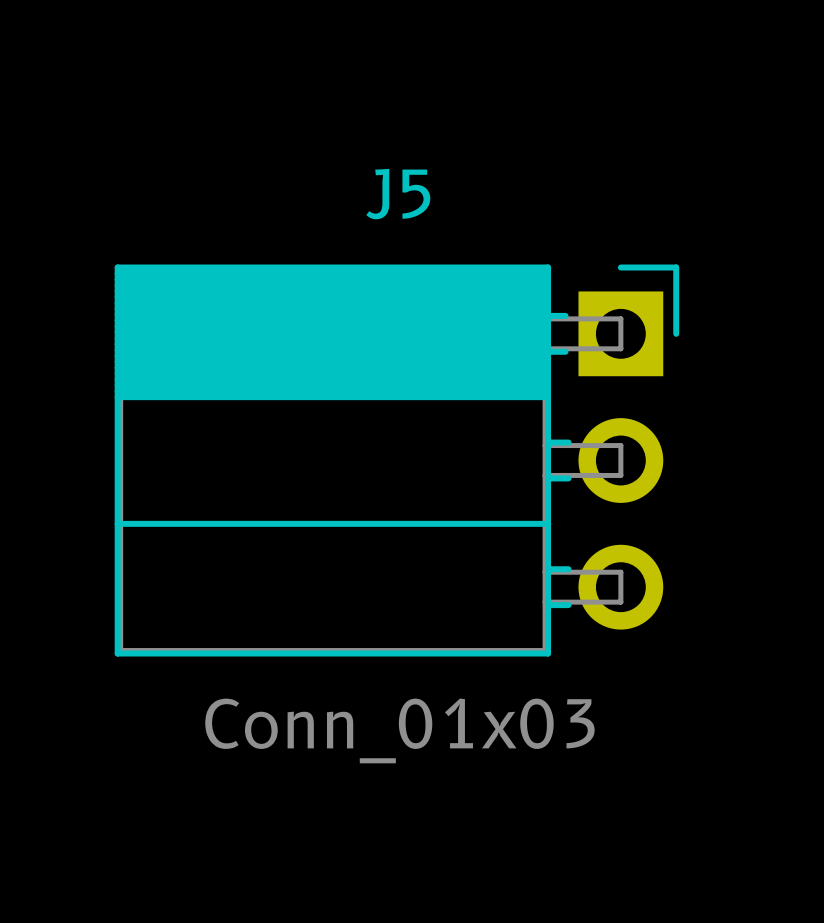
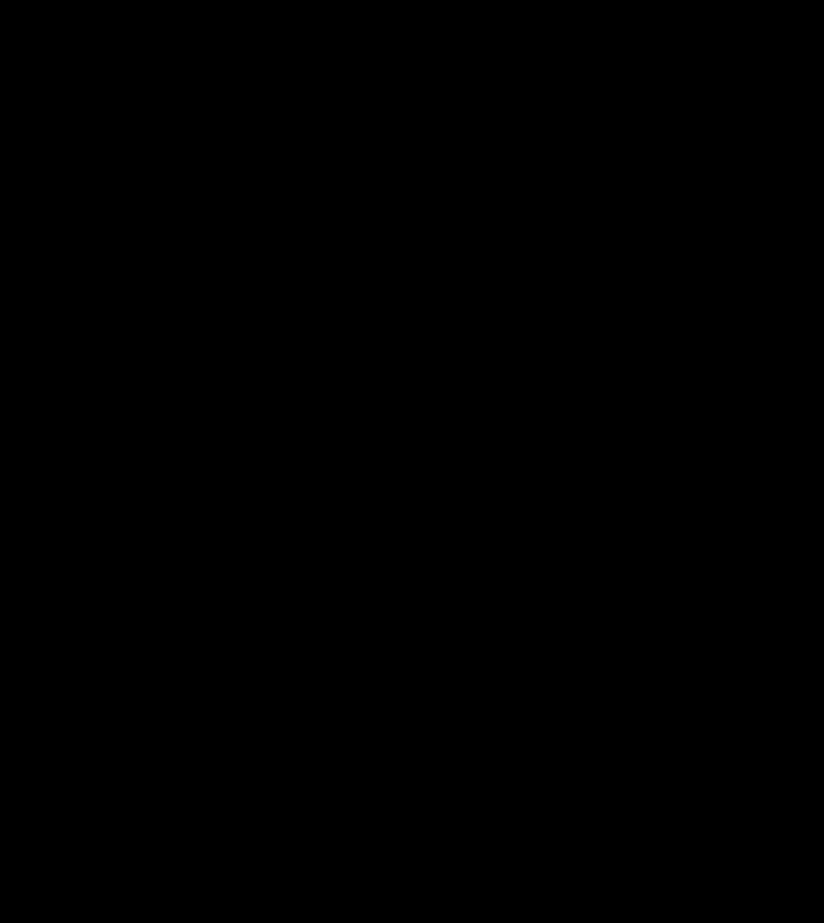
J5: Conn_01x03 (396, 460) -> none

